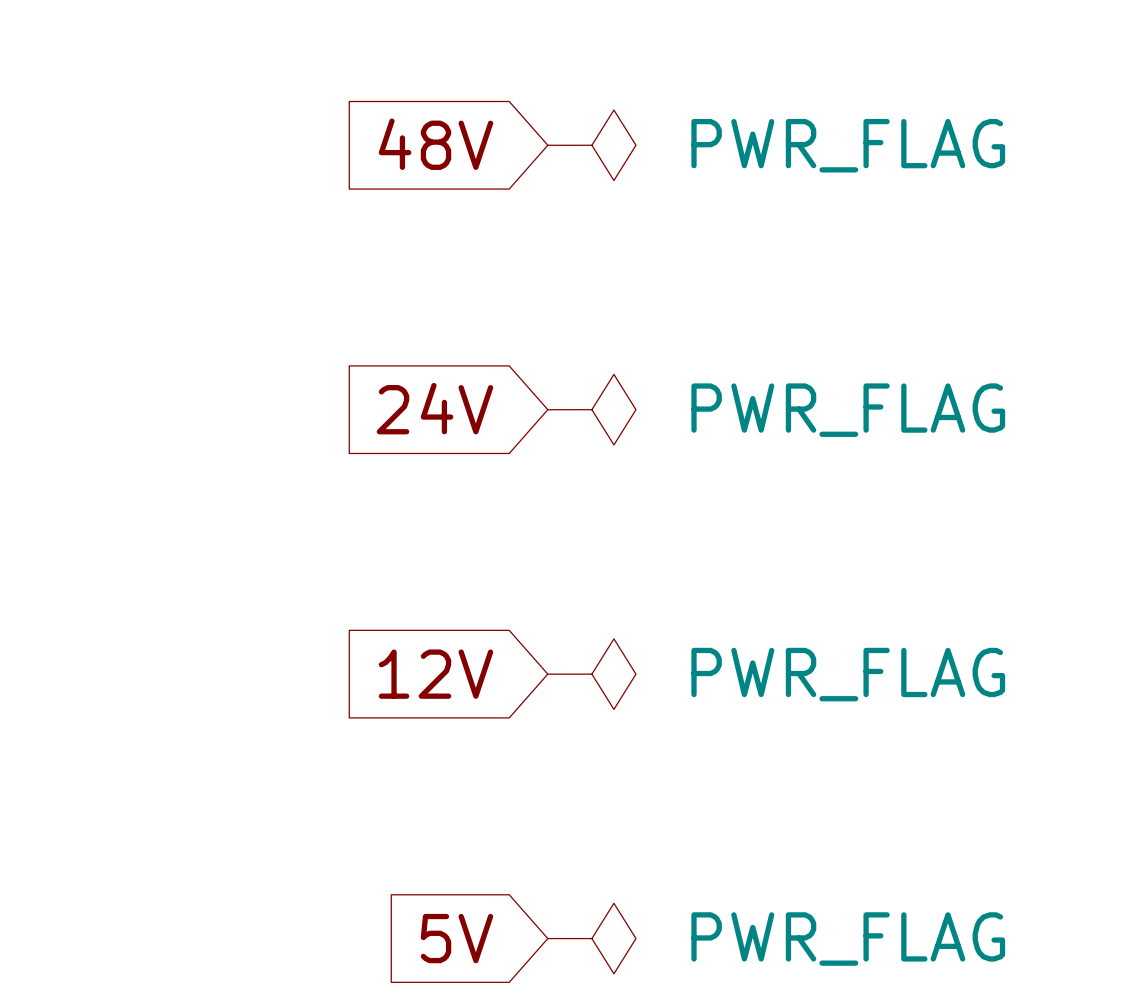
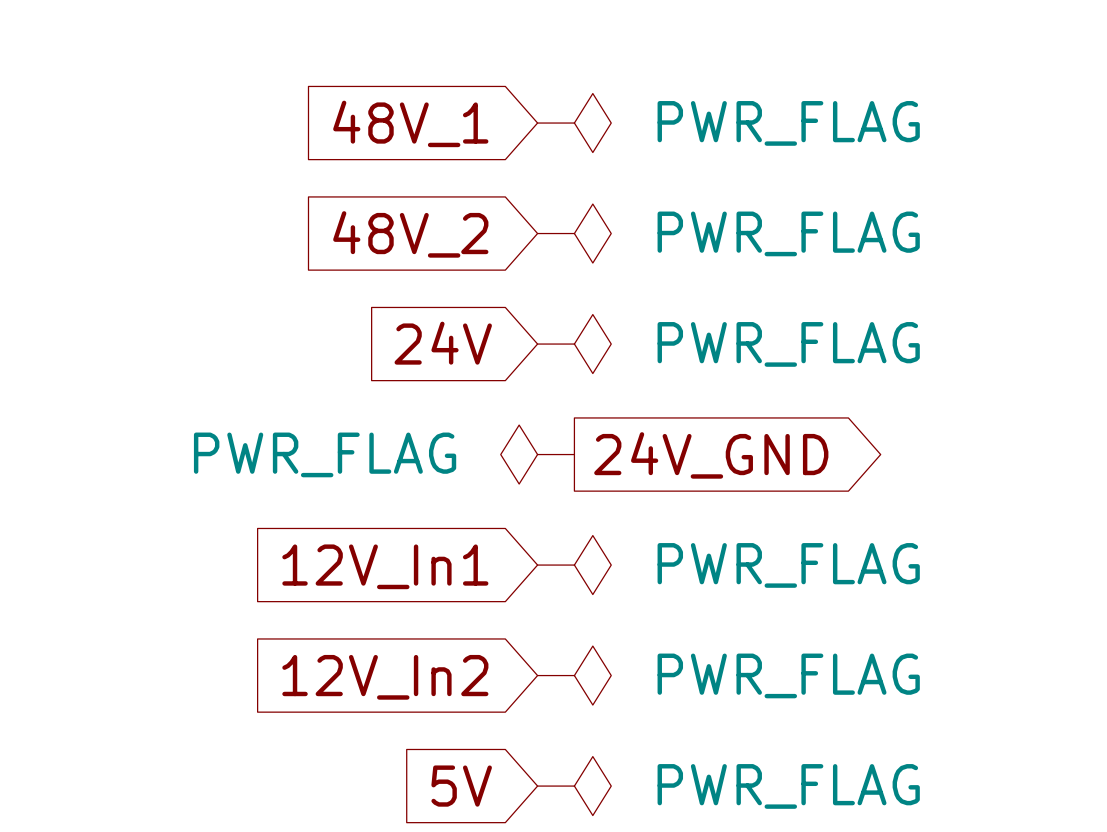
global label: 48V (436, 144) -> 48V_1 (410, 123)
power symbol: none -> PWR_FLAG (574, 233)
global label: none -> 48V_2 (410, 234)
power symbol: none -> PWR_FLAG (537, 454)
global label: none -> 24V_GND (711, 455)
global label: 12V (436, 674) -> 12V_In1 (385, 566)
power symbol: none -> PWR_FLAG (574, 675)
global label: none -> 12V_In2 (385, 677)

